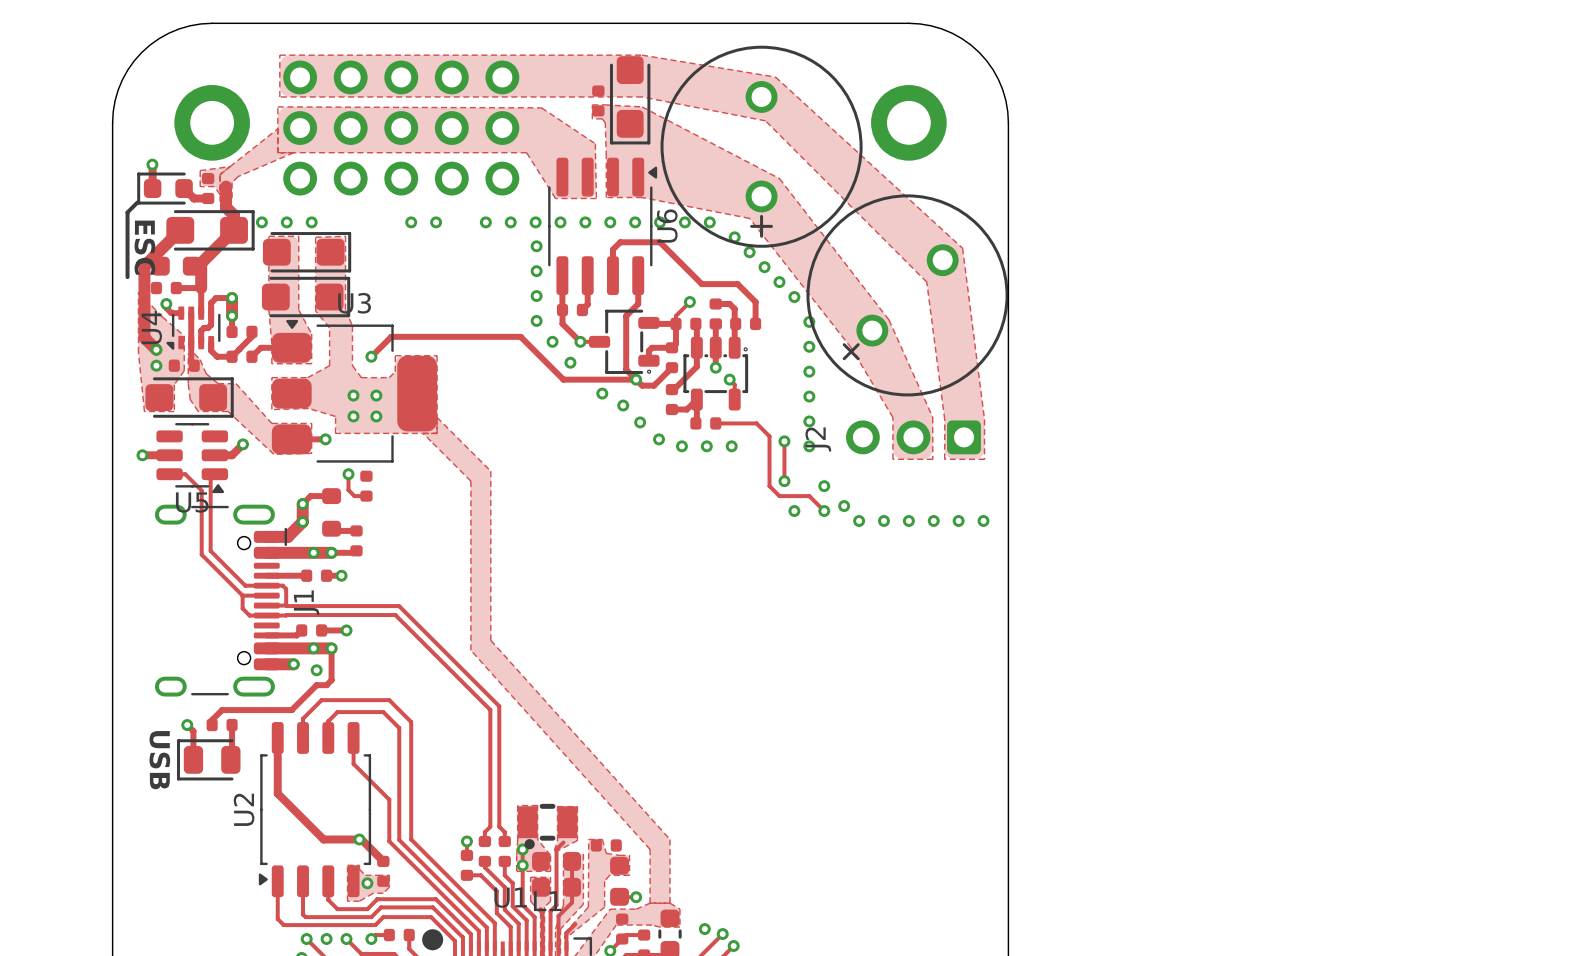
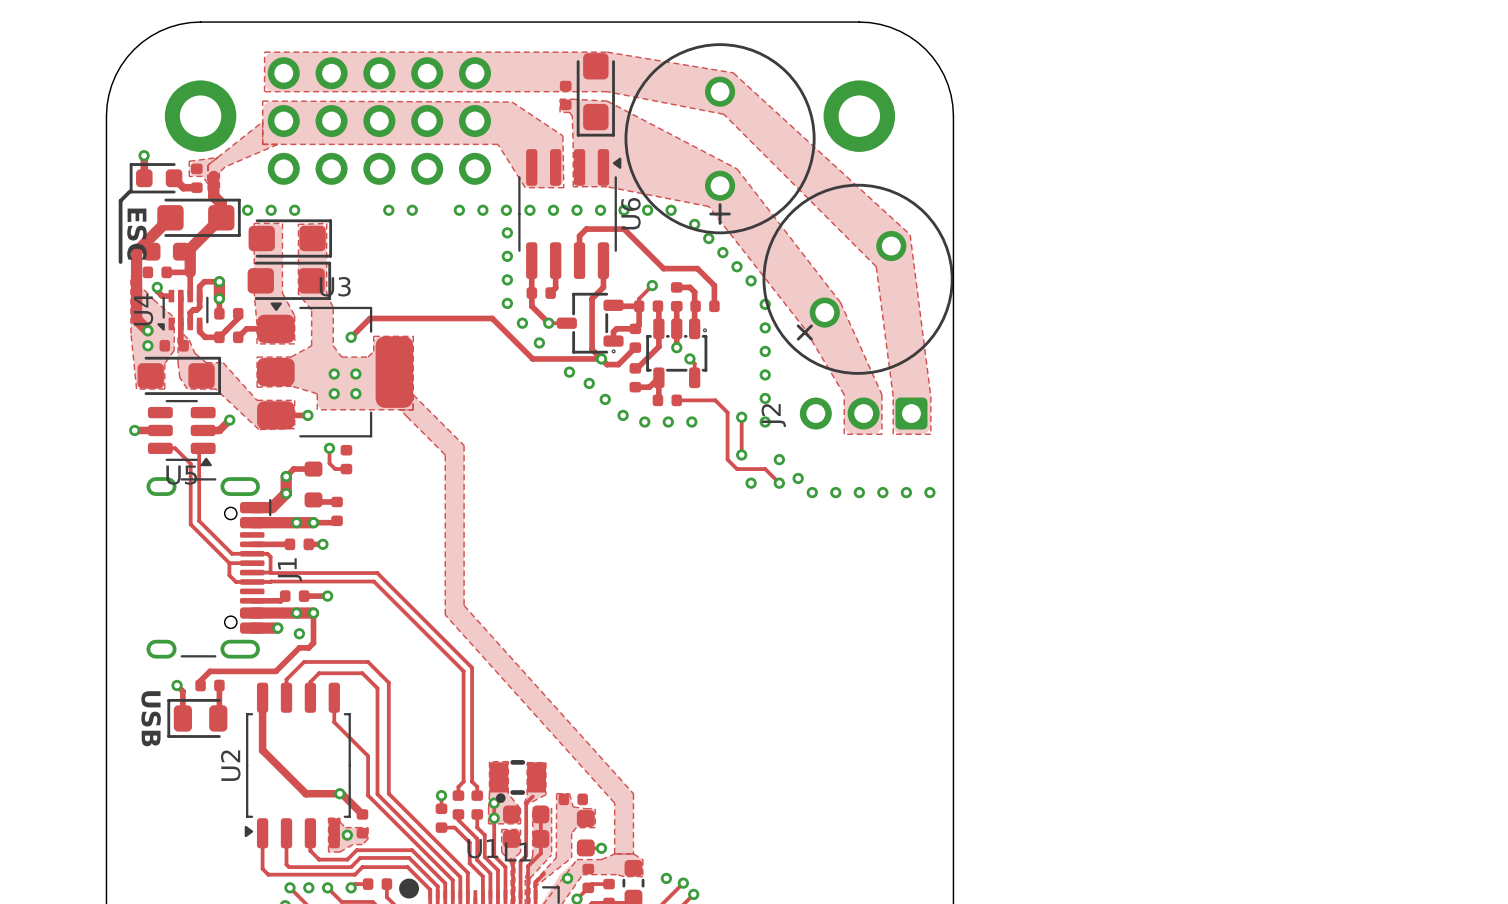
via: none -> (567, 878)

